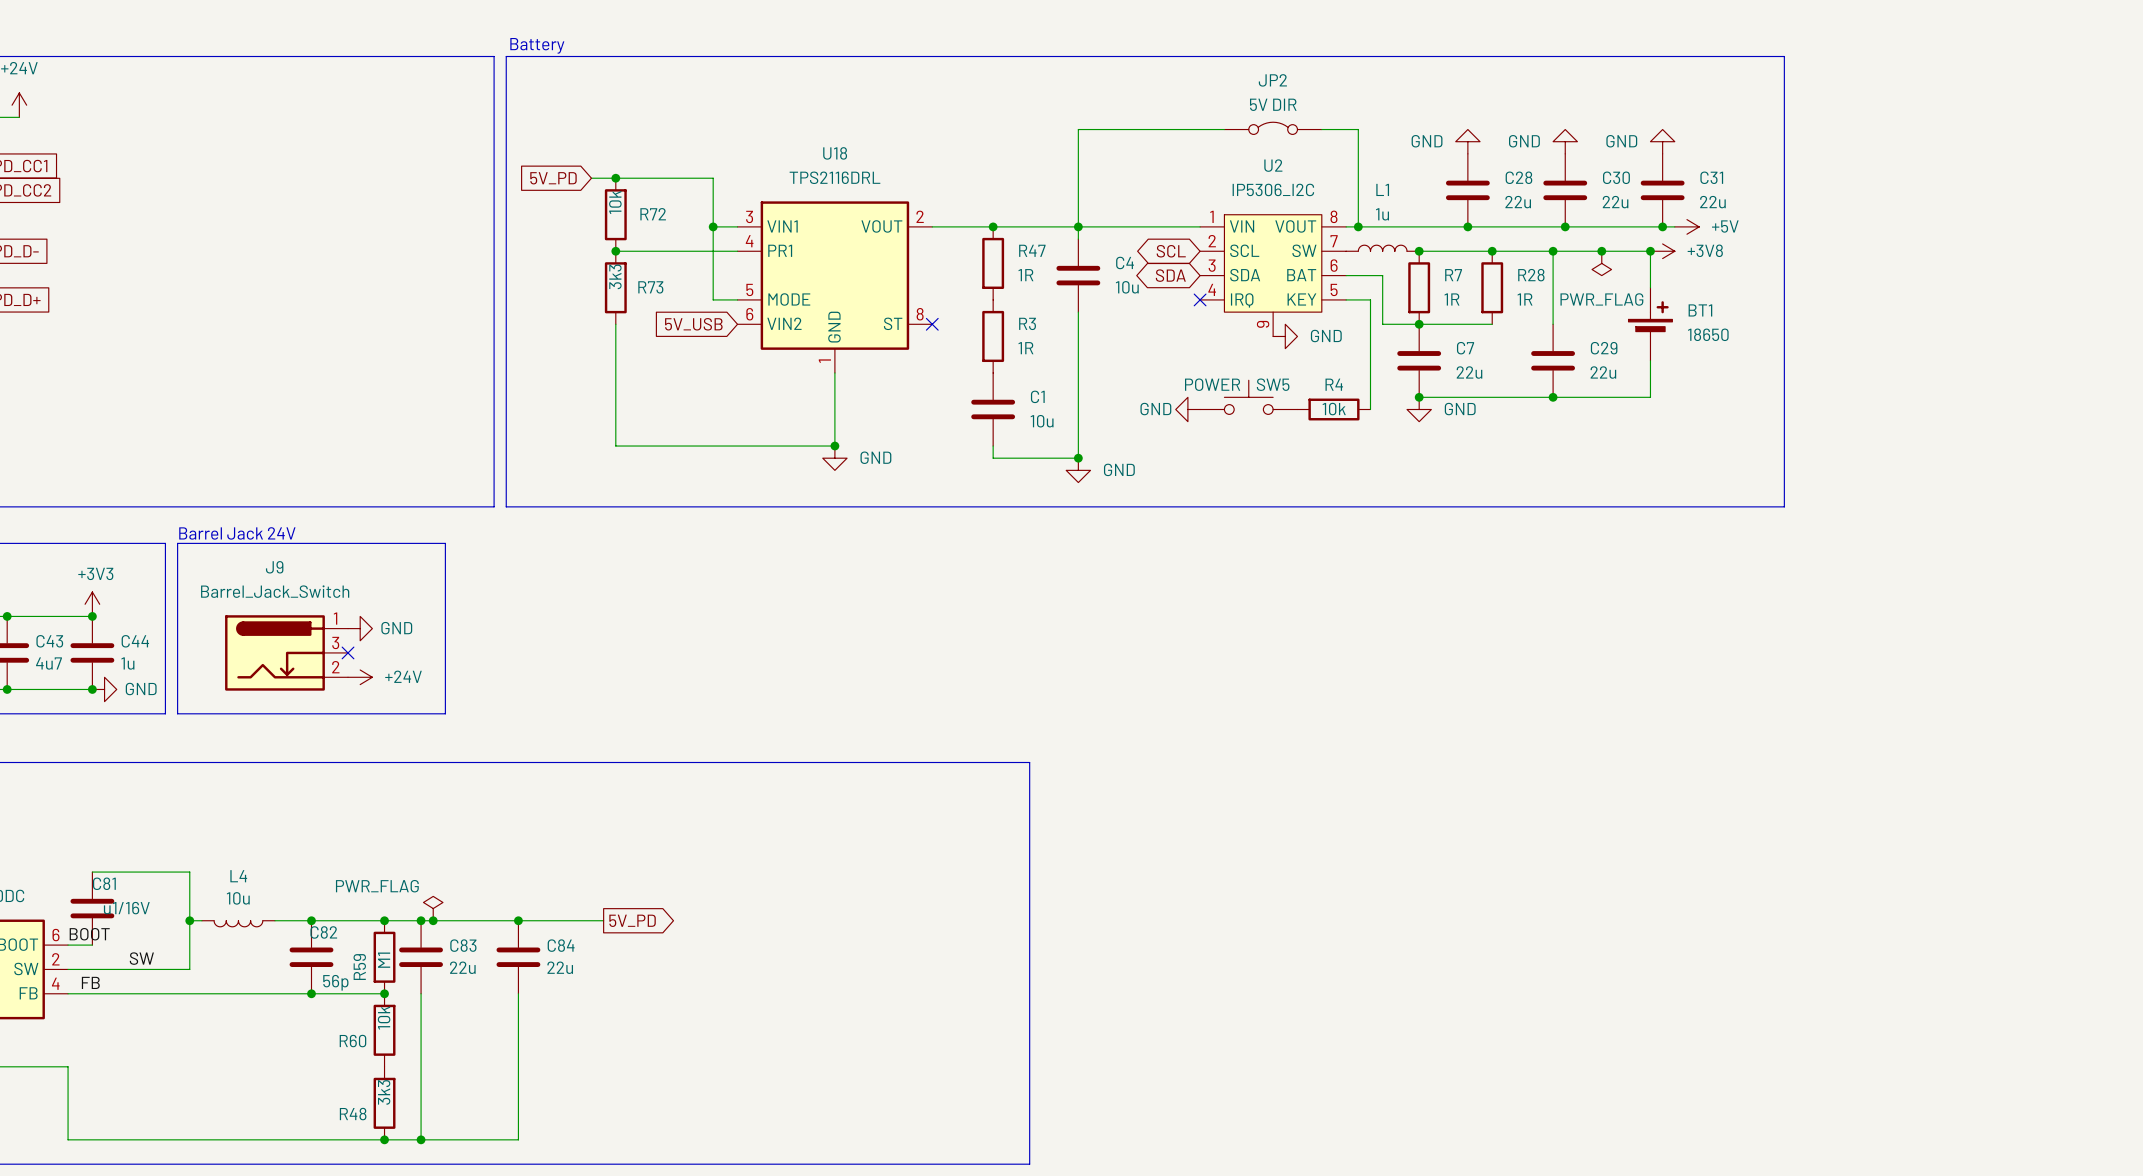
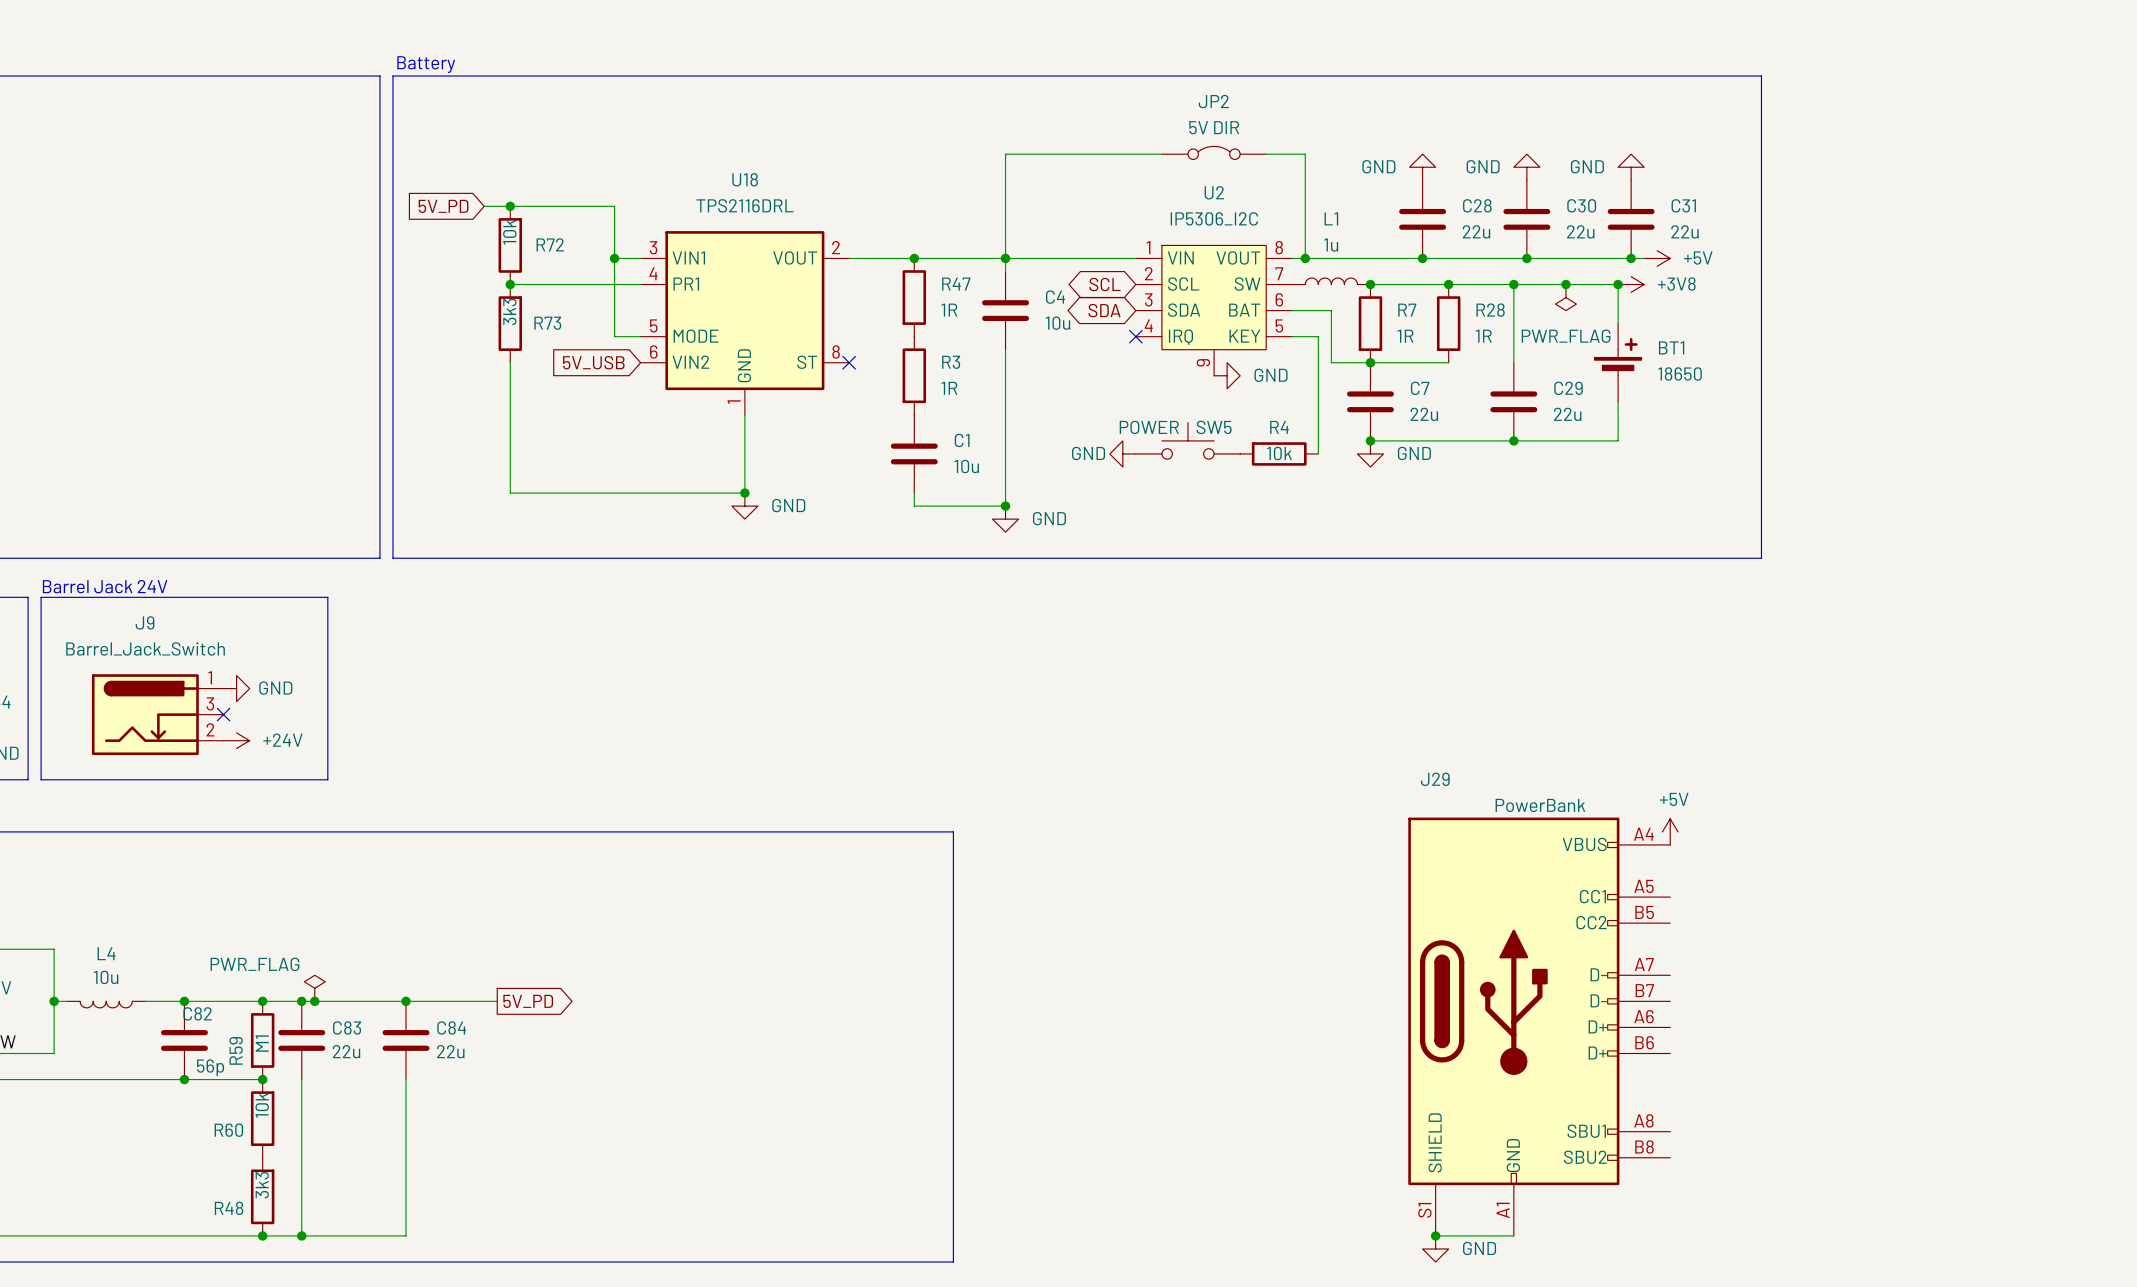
power symbol: none -> +5V (1670, 831)
J29: none -> PowerBank (1539, 1026)
wire: none -> (1435, 1235) (1513, 1235)
junction: none -> (1435, 1235)
power symbol: none -> GND (1435, 1248)

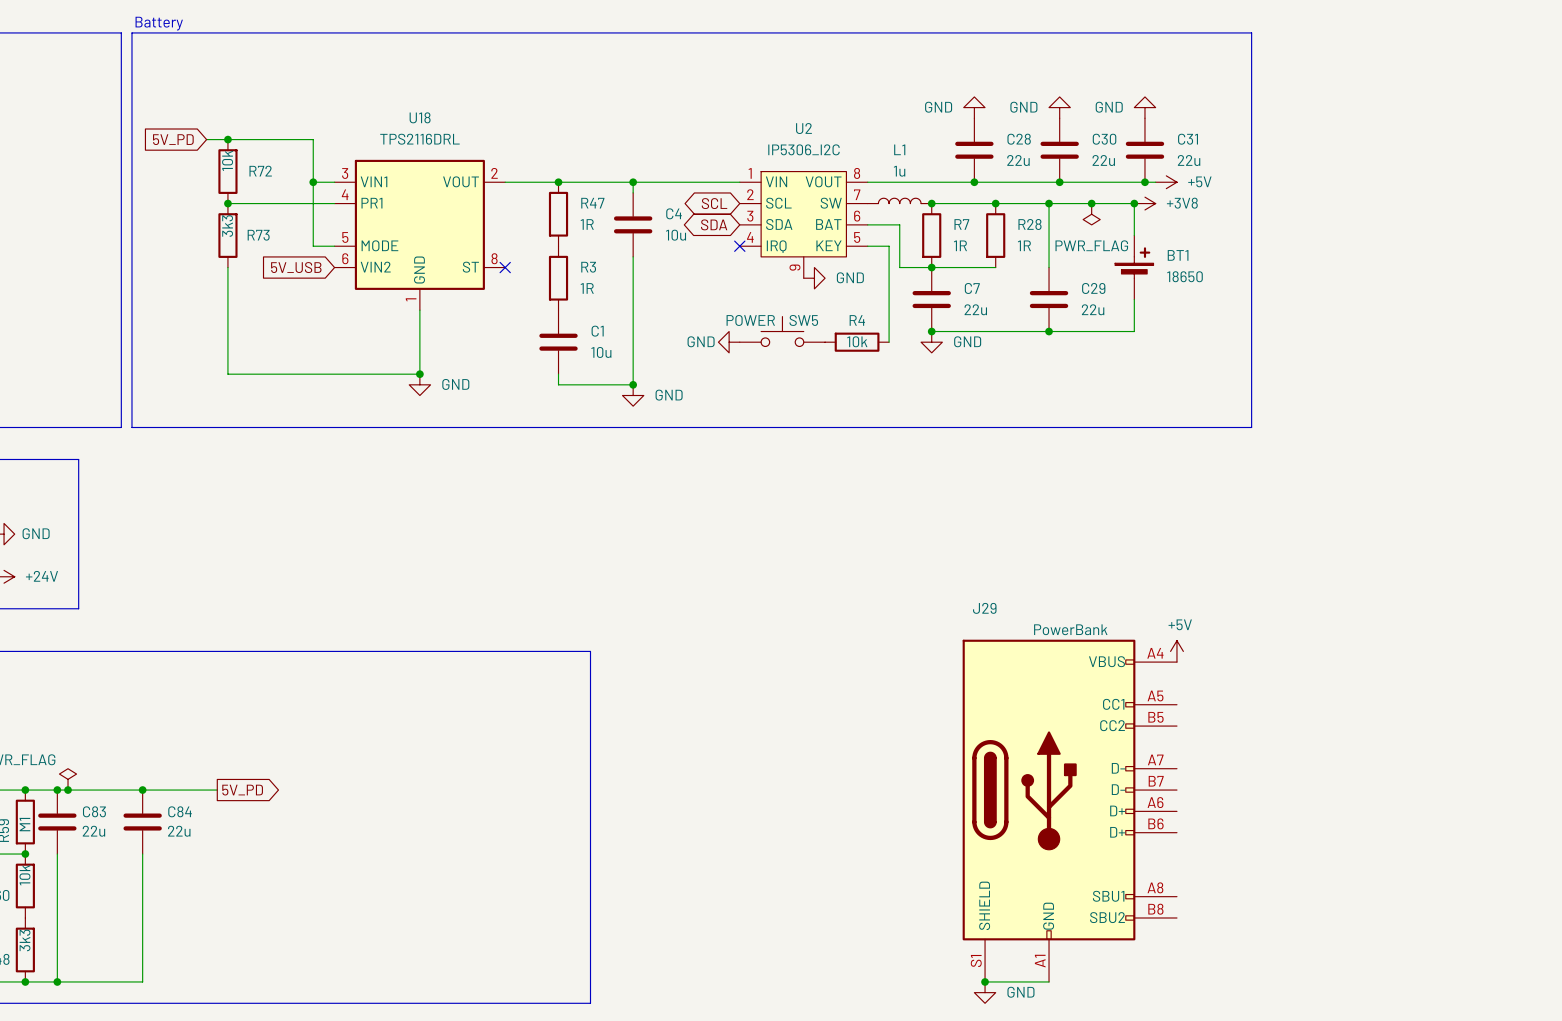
JP2: 5V DIR (1214, 152) -> none
wire: (1161, 154) (1005, 154) (1005, 258) -> none
wire: (1266, 154) (1305, 154) (1305, 258) -> none
junction: (1305, 258) -> none

